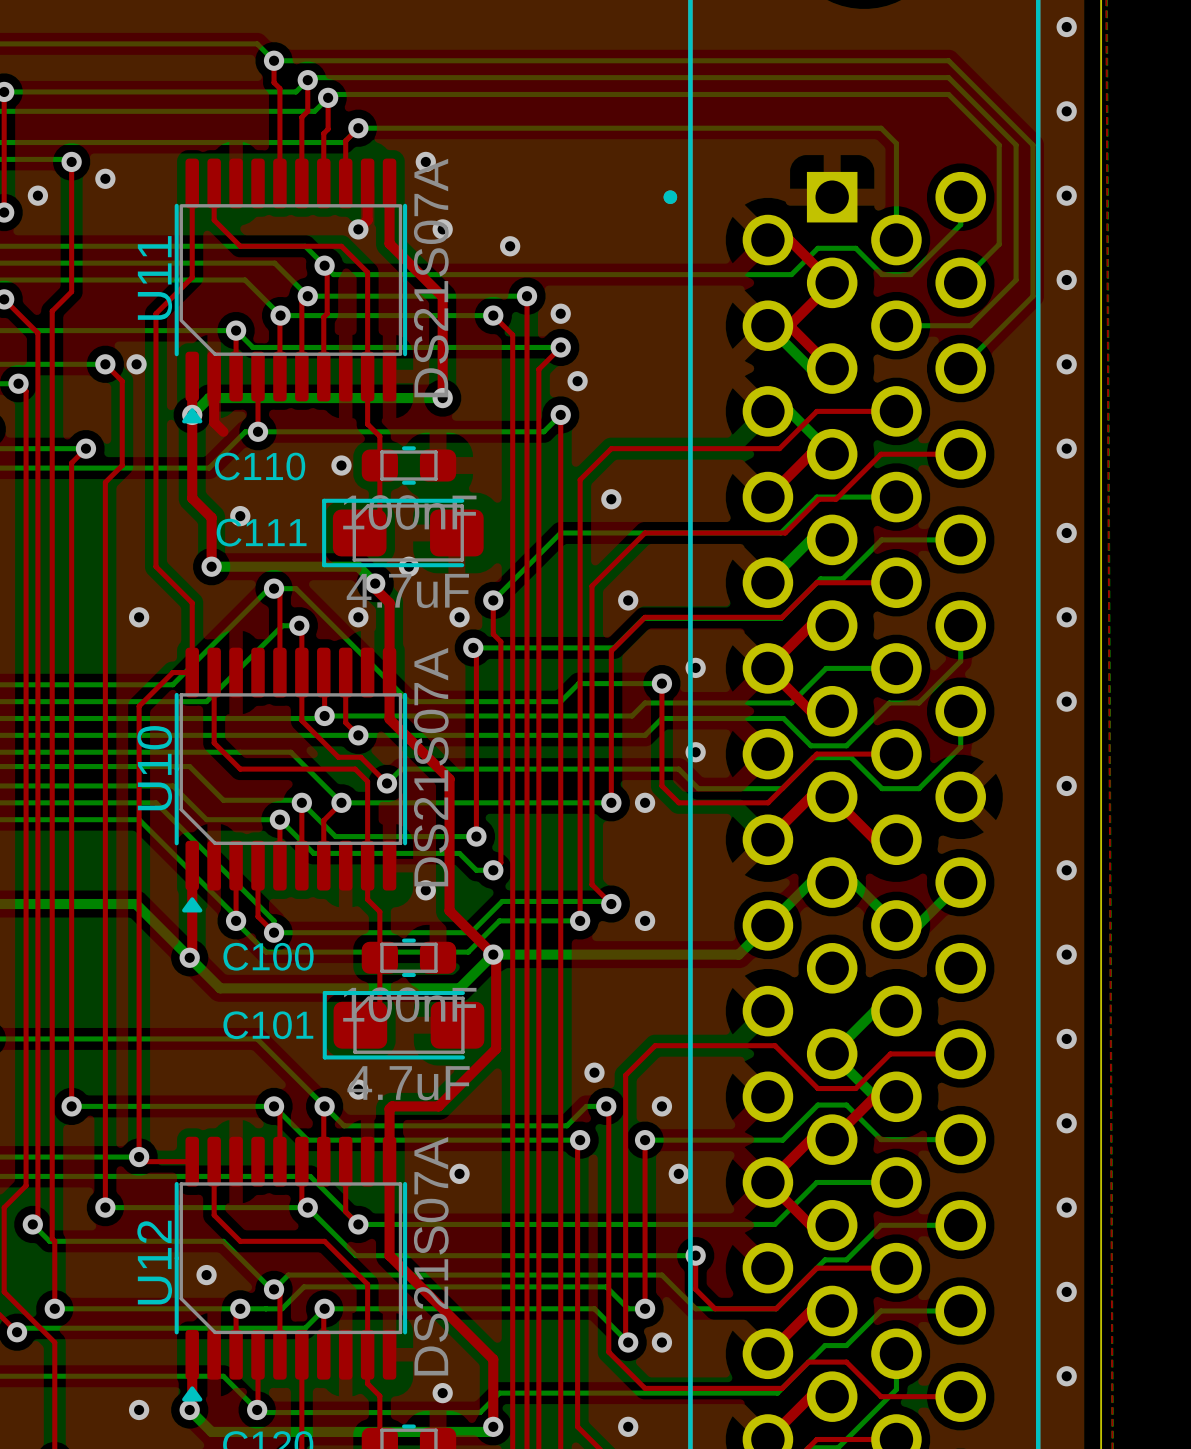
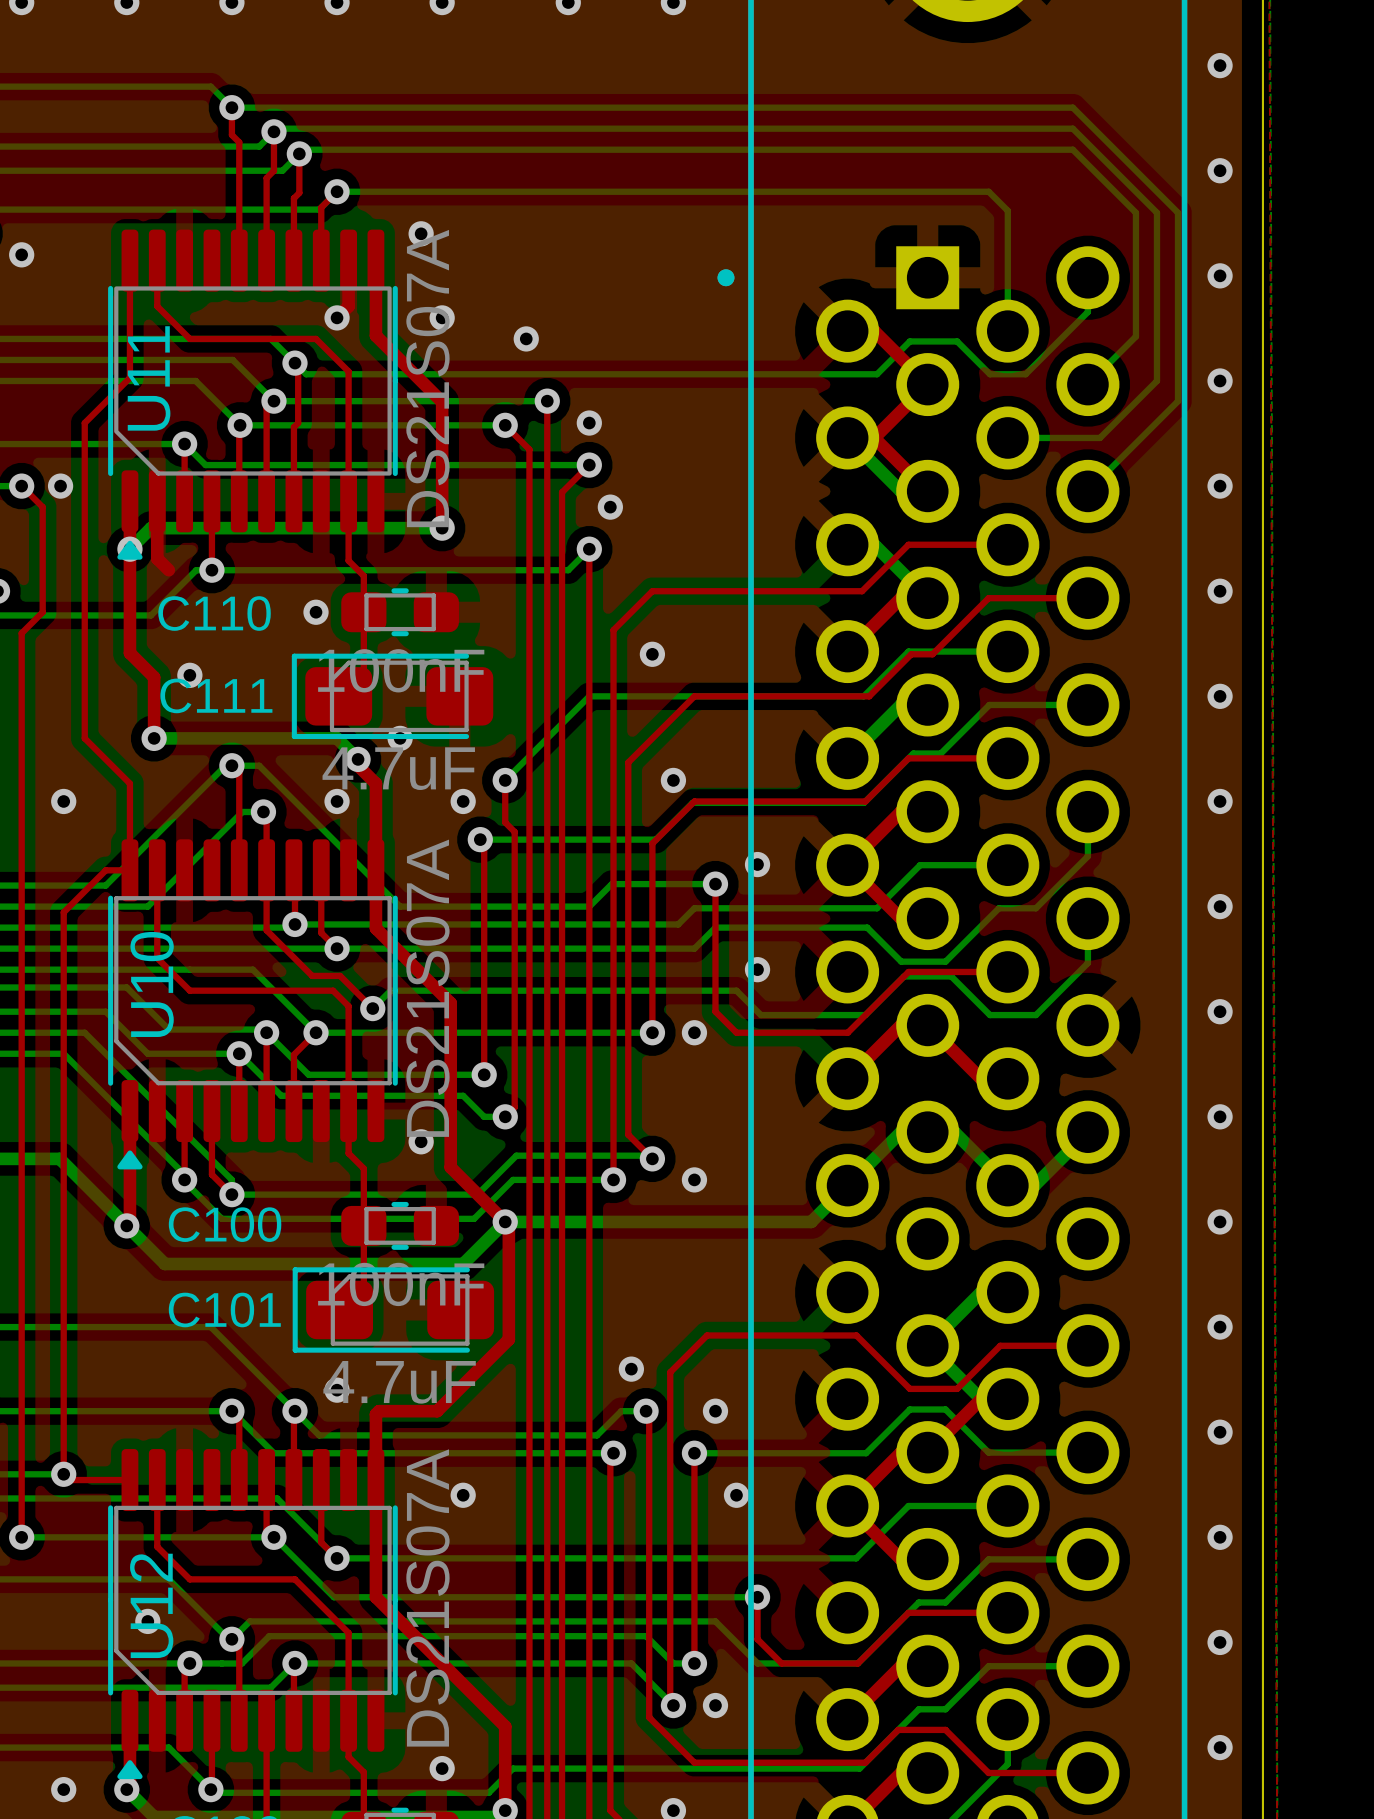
U11 name position: U11 (154, 277) -> U11 (149, 378)
U10 name position: U10 (154, 768) -> U10 (152, 984)
U12 name position: U12 (154, 1262) -> U12 (151, 1605)

